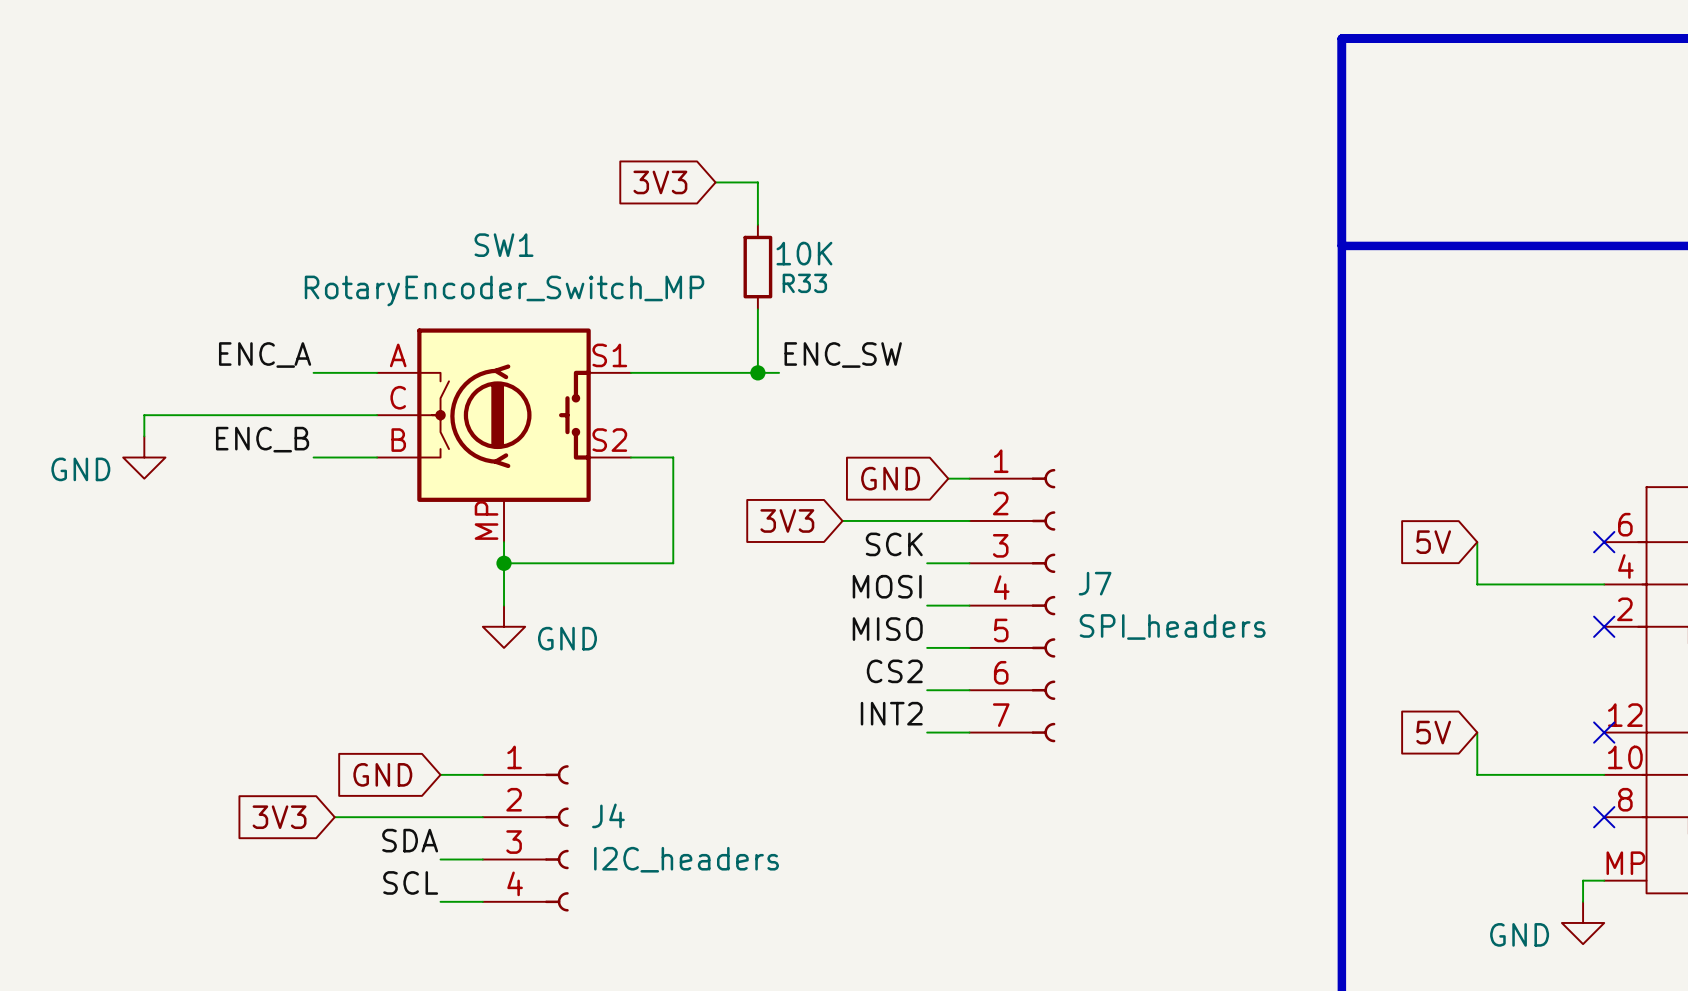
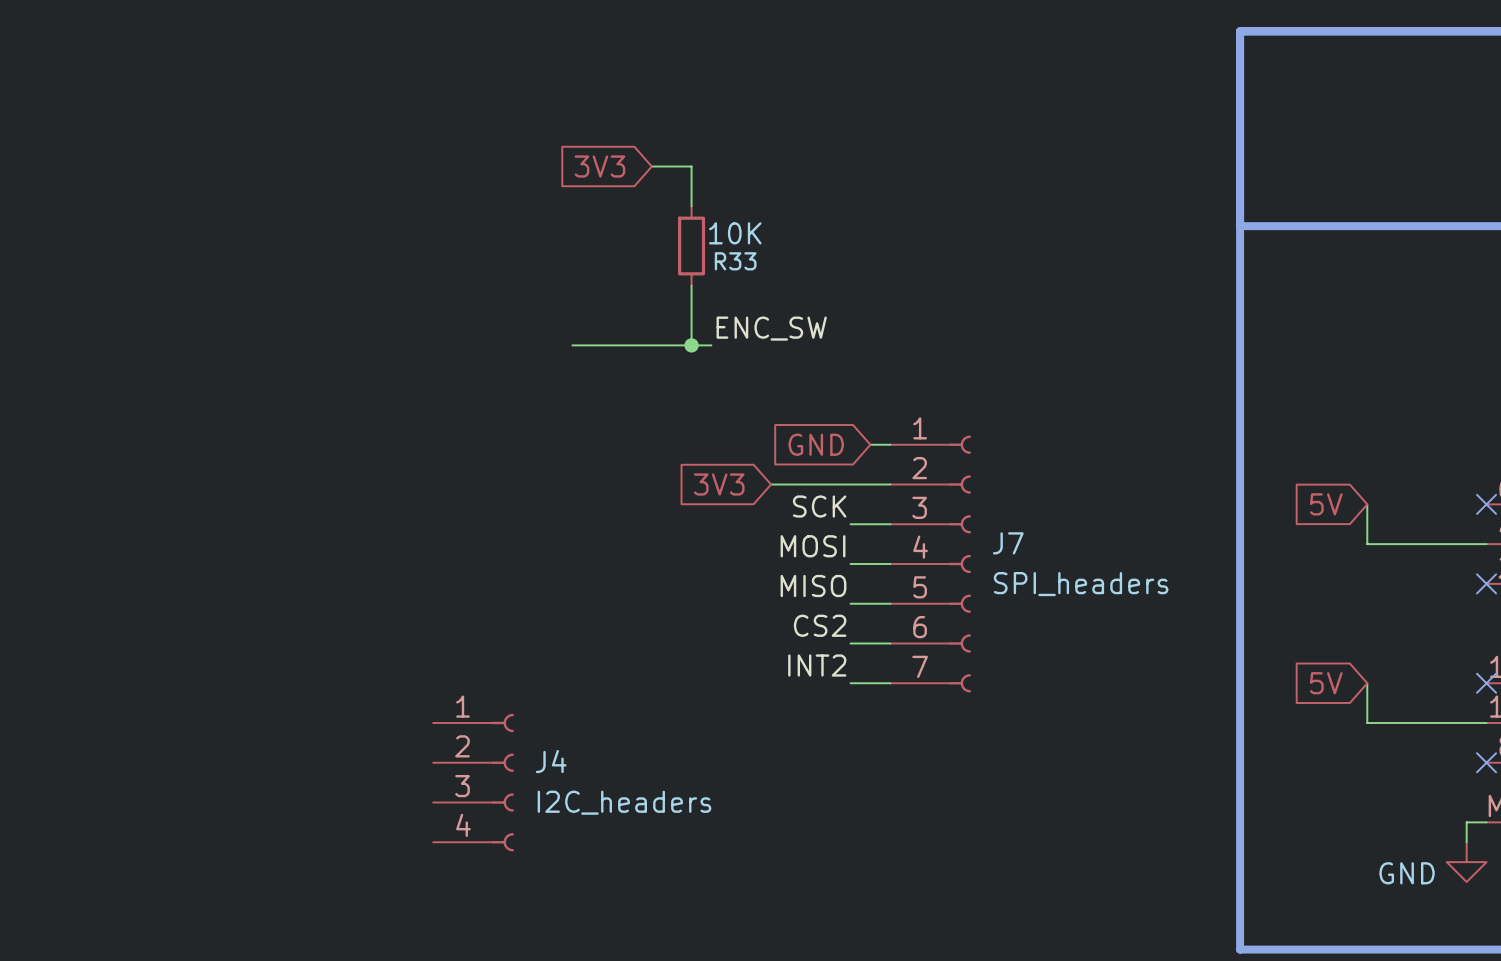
label: ENC_A (265, 355) -> none
wire: (313, 372) (377, 372) -> none
wire: (377, 415) (144, 415) (144, 436) -> none
SW1: RotaryEncoder_Switch_MP (504, 435) -> none
label: ENC_B (262, 439) -> none
power symbol: GND (144, 457) -> none
wire: (313, 457) (377, 457) -> none
wire: (630, 457) (673, 457) (673, 563) (504, 563) -> none
wire: (504, 542) (504, 605) -> none
junction: (504, 563) -> none
power symbol: GND (504, 626) -> none
global label: GND (382, 774) -> none
wire: (440, 774) (482, 774) -> none
global label: 3V3 (279, 817) -> none
wire: (334, 817) (482, 817) -> none
label: SDA (410, 840) -> none
wire: (440, 859) (482, 859) -> none
label: SCL (410, 882) -> none
wire: (440, 901) (482, 901) -> none

